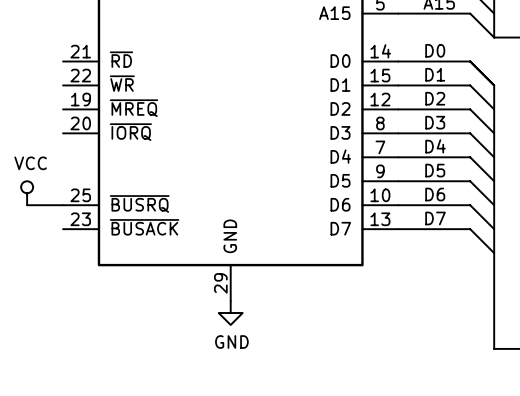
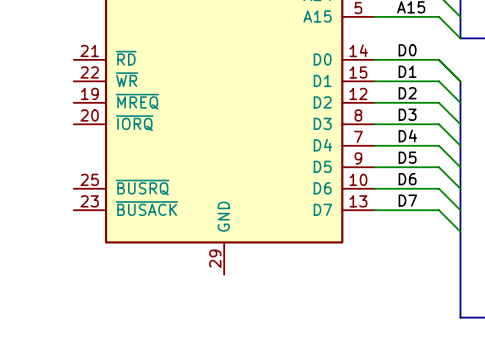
power symbol: VCC (27, 193) -> none
wire: (27, 205) (63, 205) -> none
power symbol: GND (230, 312) -> none

